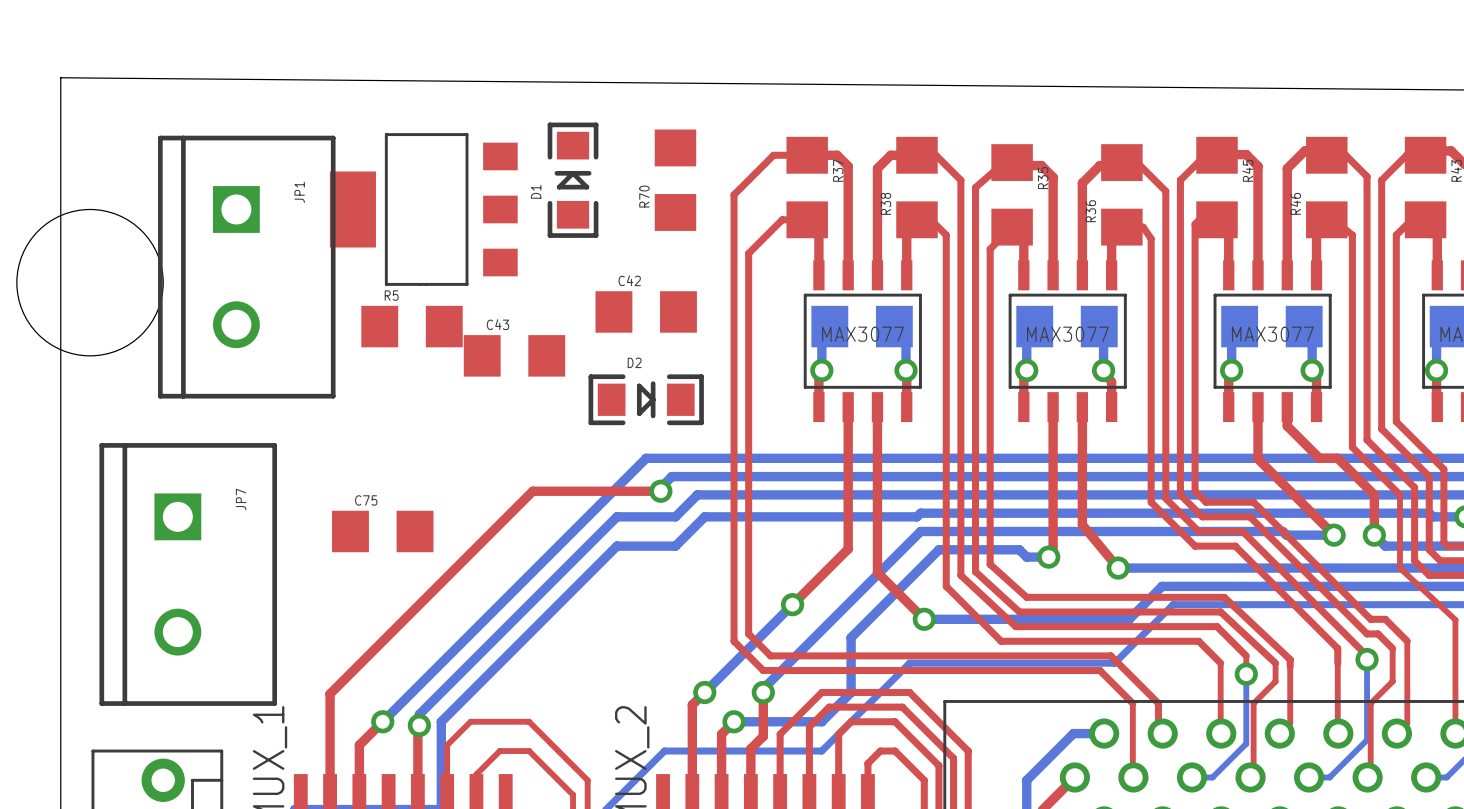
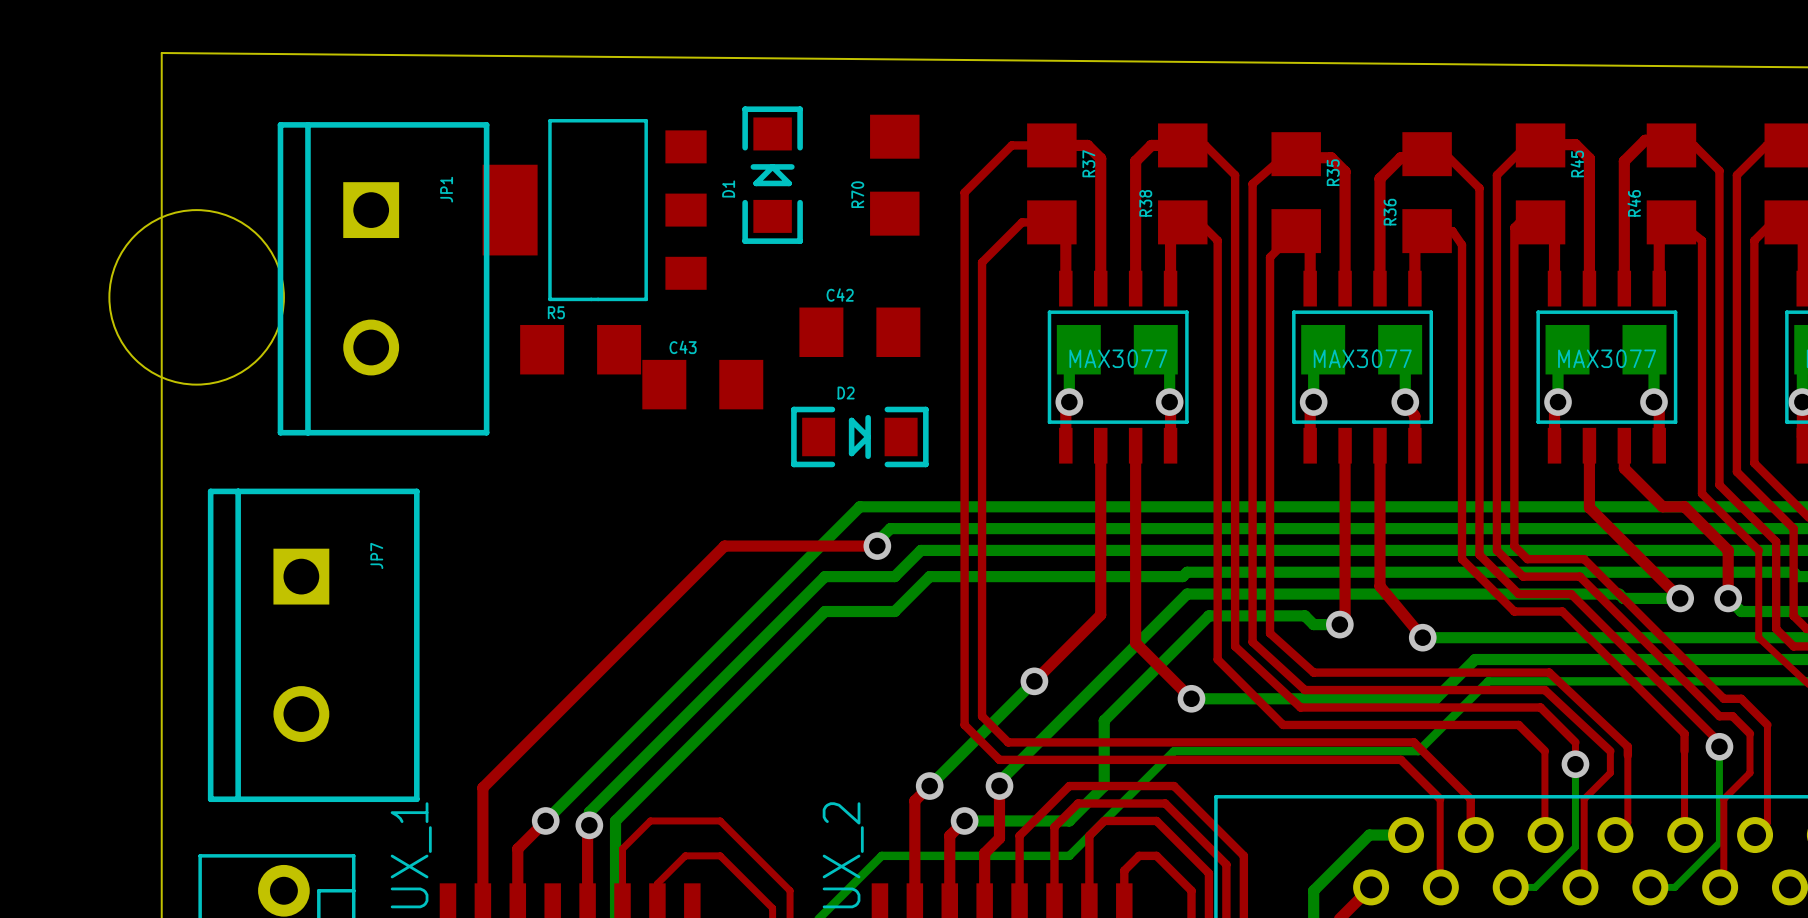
C75: (382, 531) -> none

